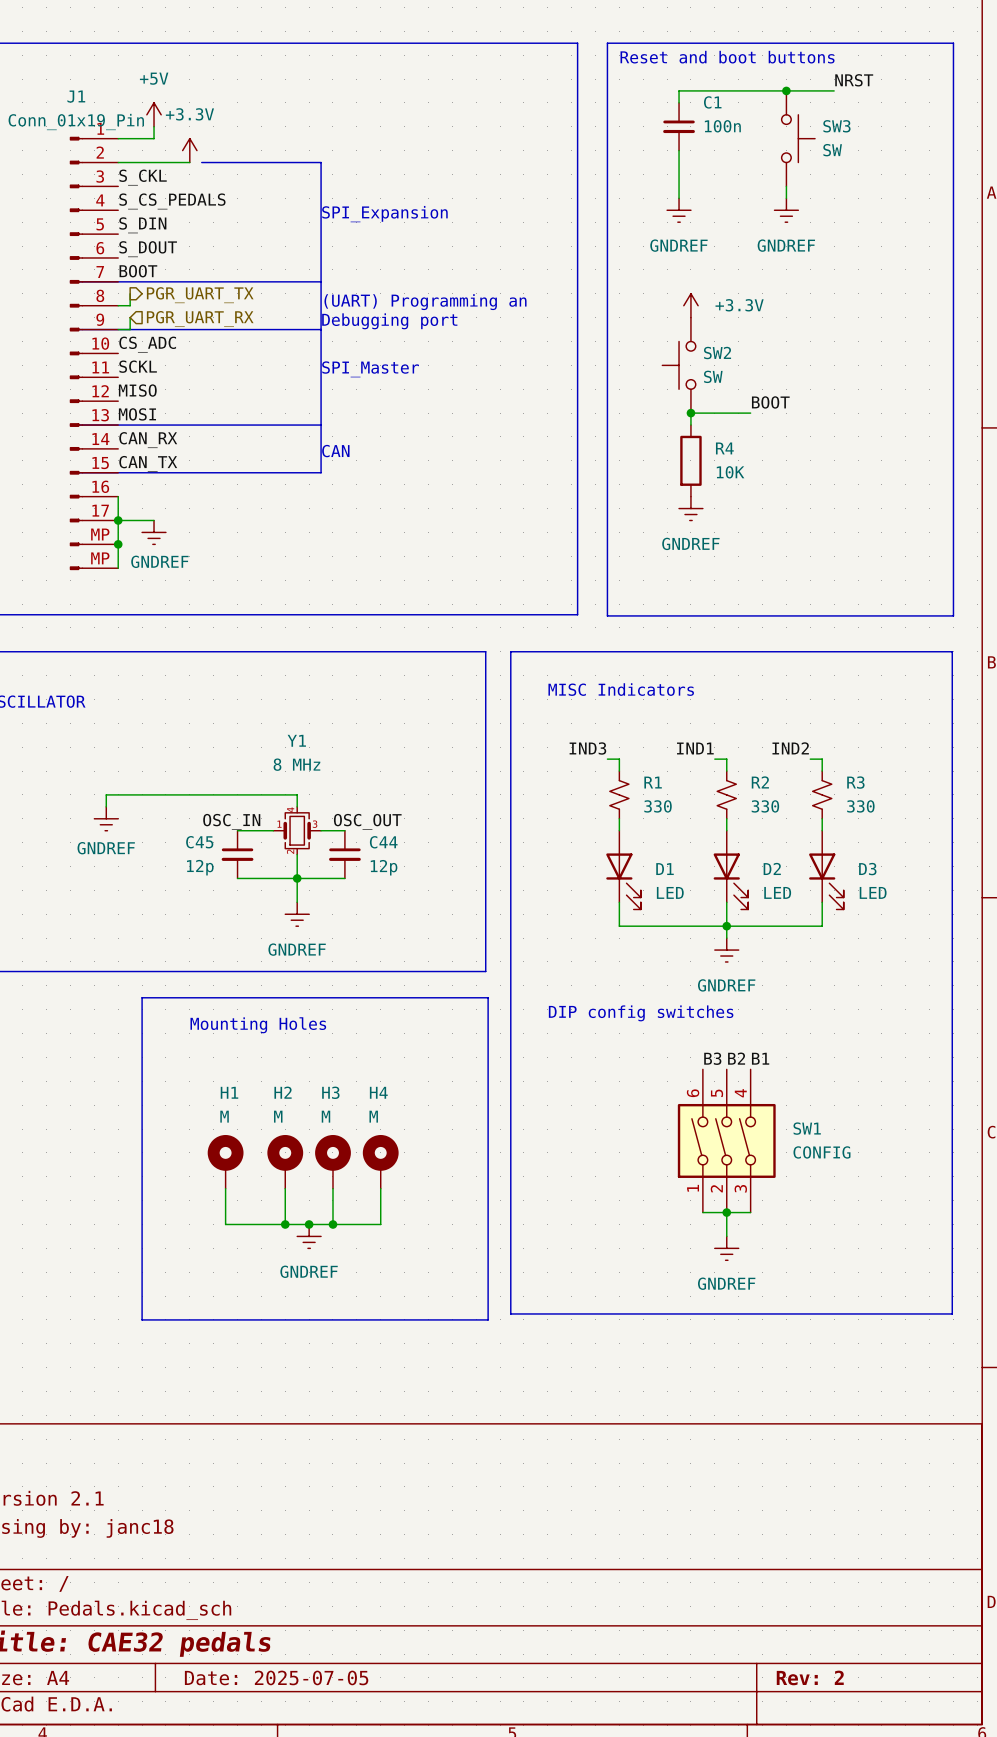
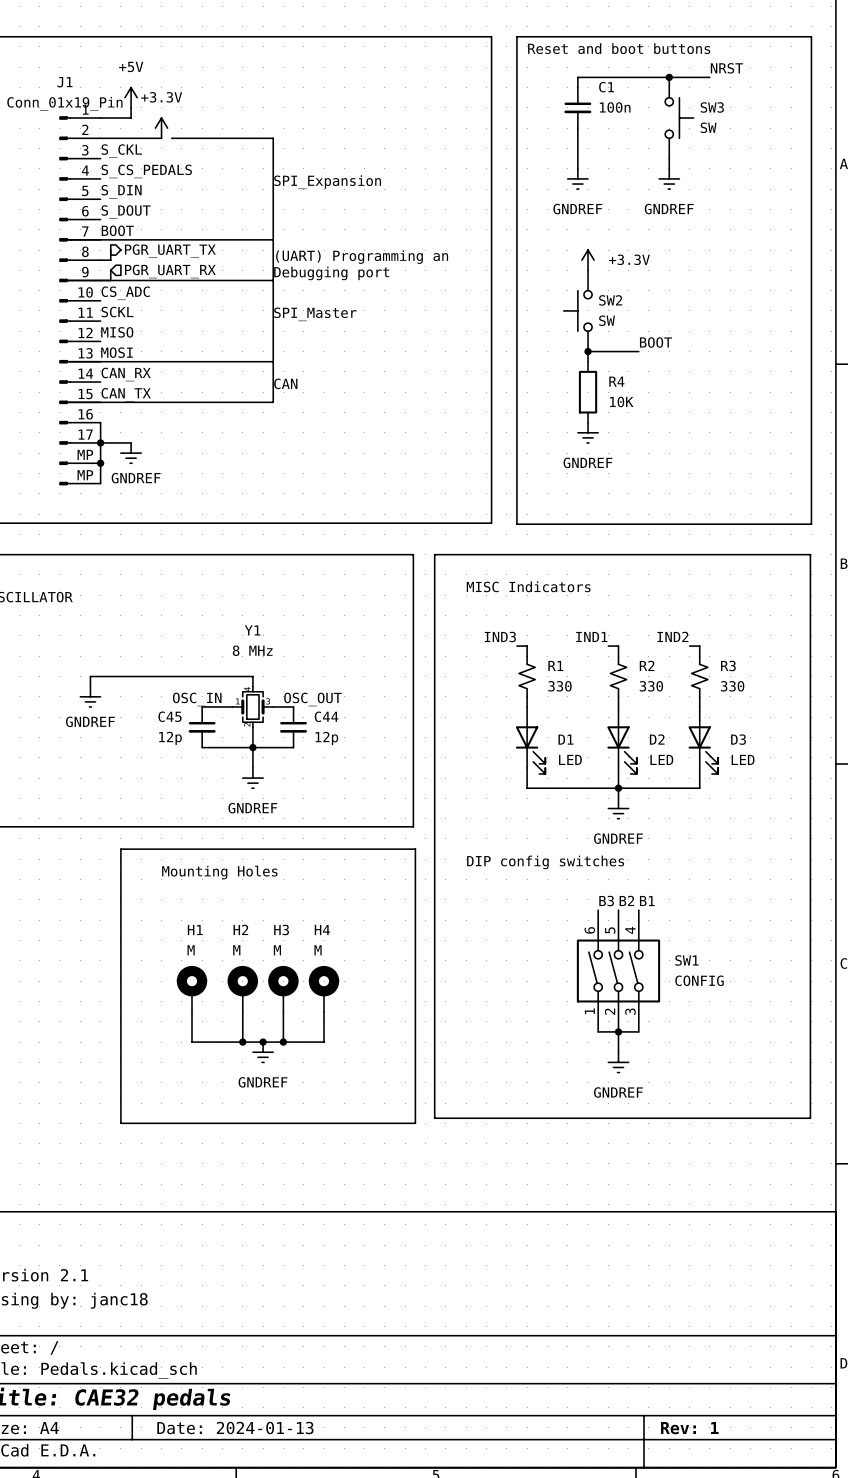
title block: Date: 2025-07-05 (276, 1677) -> Date: 2024-01-13 (235, 1428)
title block: Rev: 2 (810, 1677) -> Rev: 1 (689, 1428)

